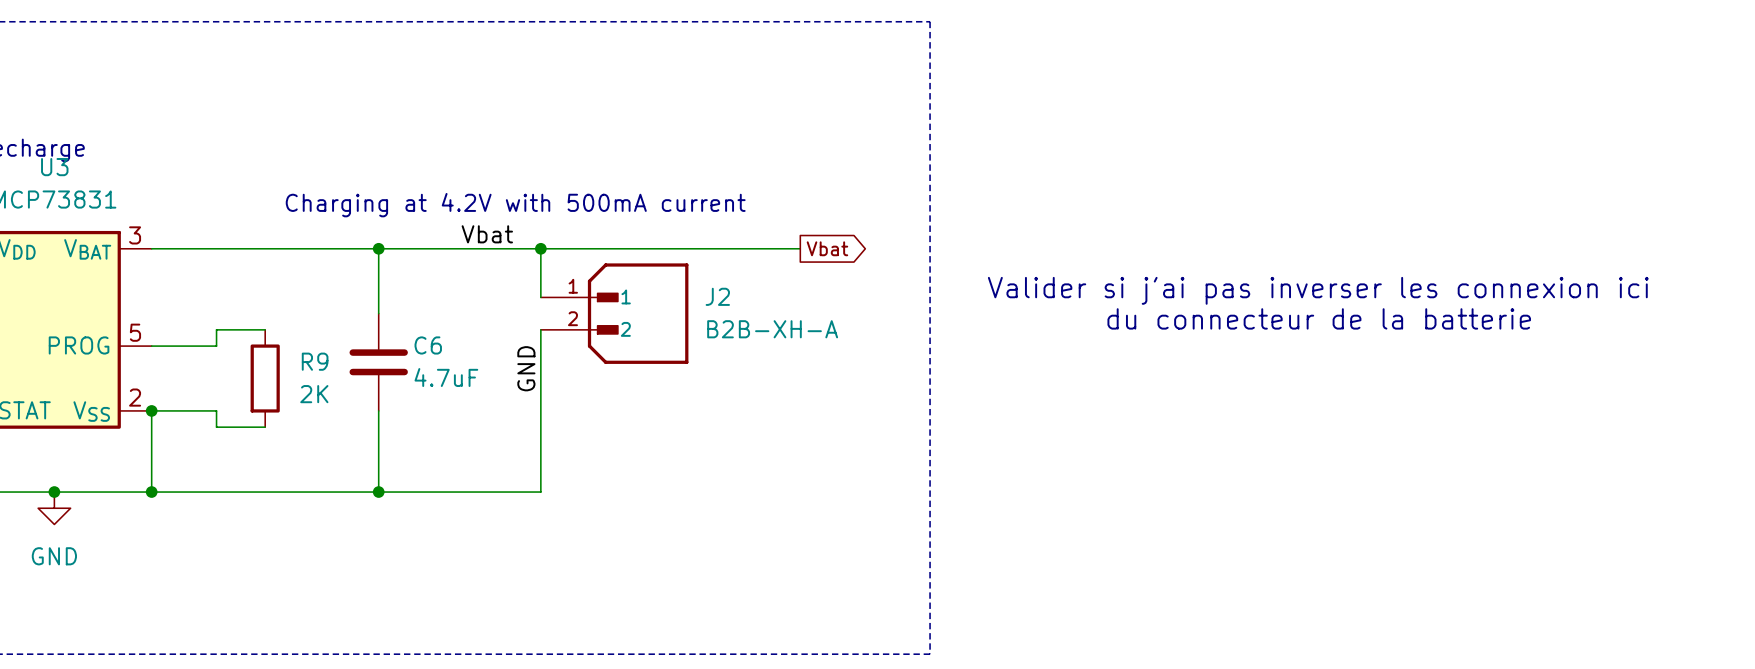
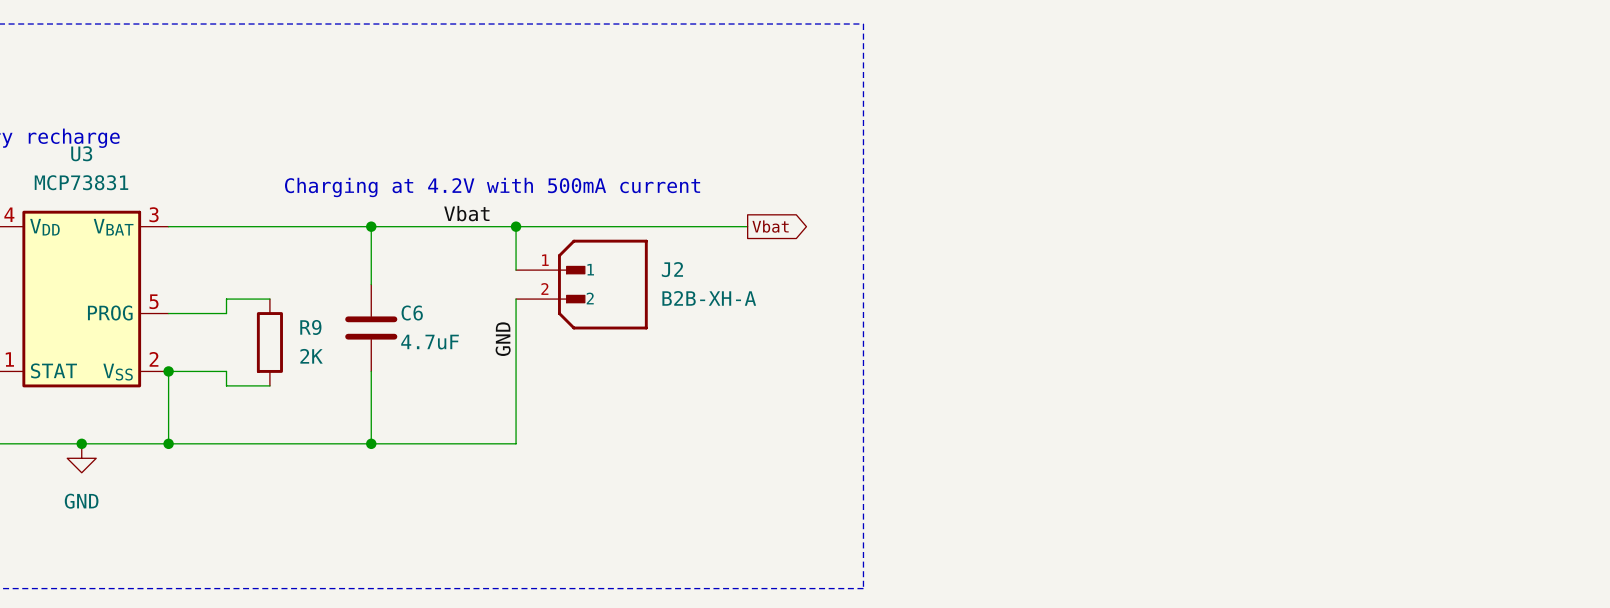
text: Valider si j'ai pas inverser les connexion ici (1318, 290) -> none
text: du connecteur de la batterie (1319, 318) -> none

